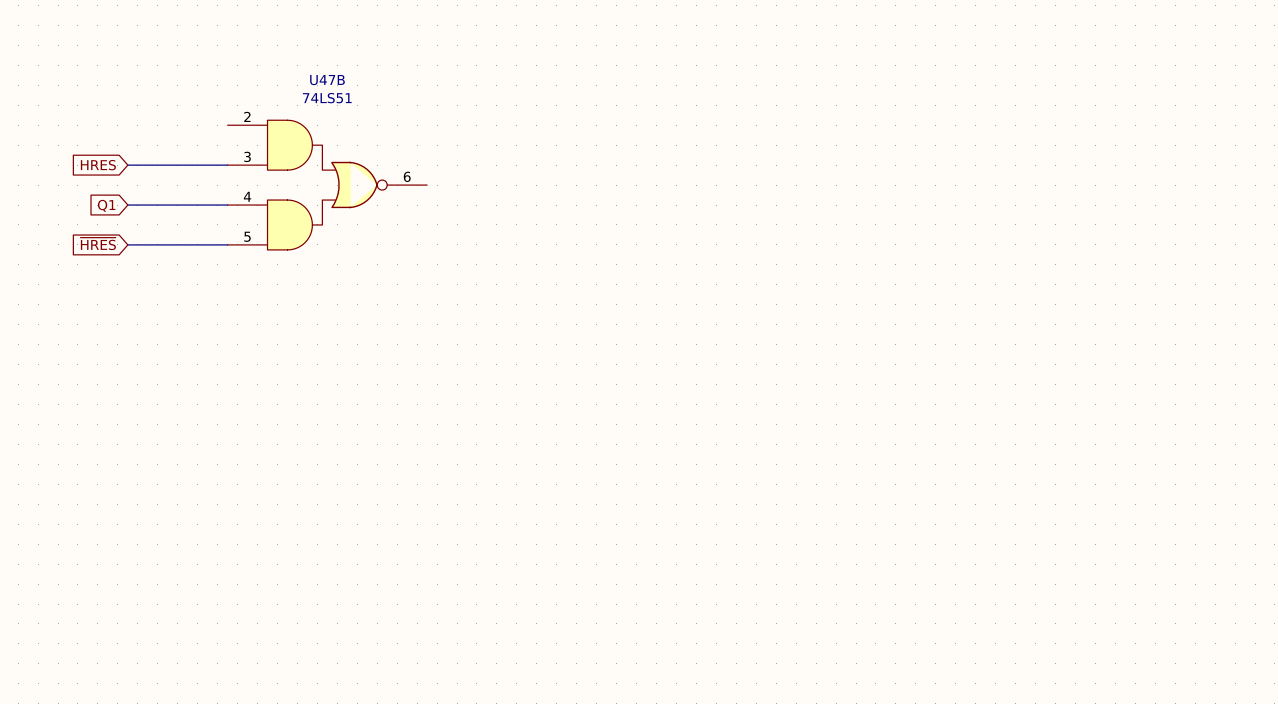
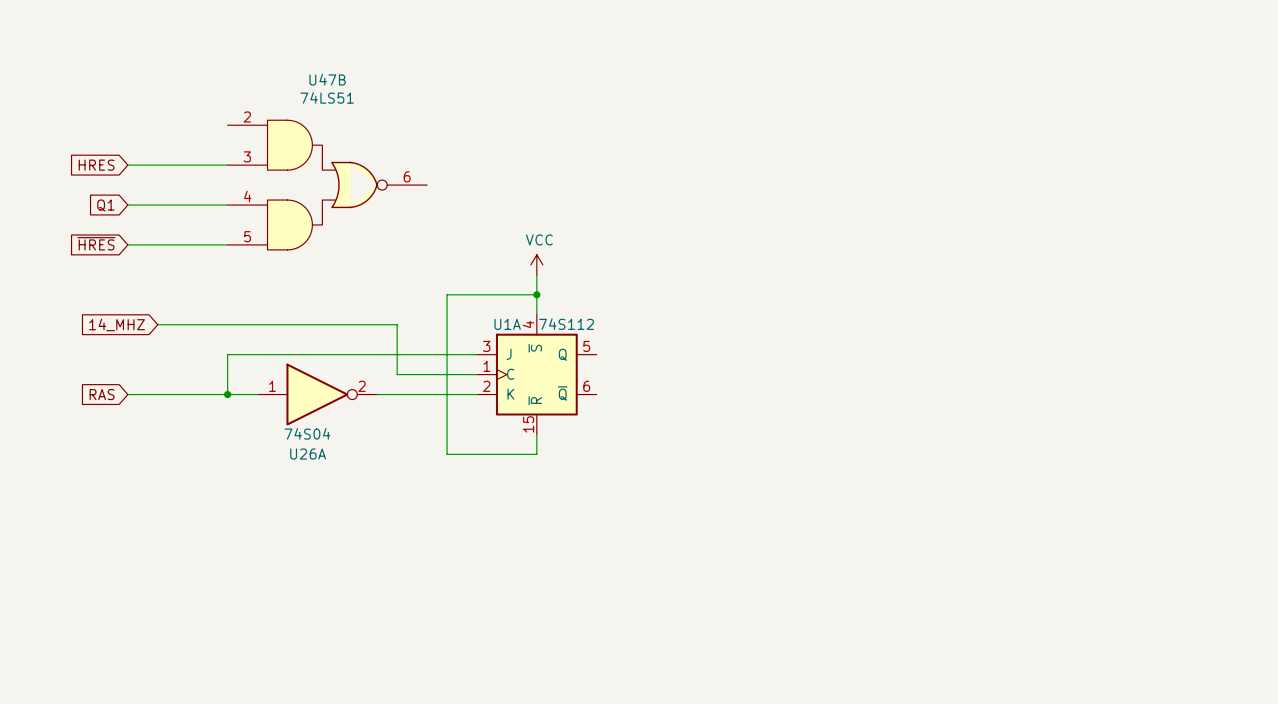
power symbol: none -> VCC (536, 264)
wire: none -> (536, 274) (536, 314)
wire: none -> (536, 294) (447, 294) (447, 454) (536, 454) (536, 434)
junction: none -> (536, 294)
wire: none -> (157, 324) (397, 324) (397, 374) (476, 374)
global label: none -> 14_MHZ (117, 324)
wire: none -> (476, 354) (227, 354) (227, 394)
U1A: none -> 74S112 (536, 374)
global label: none -> RAS (102, 394)
wire: none -> (127, 394) (257, 394)
junction: none -> (227, 394)
U26A: none -> 74S04 (317, 394)
wire: none -> (377, 394) (476, 394)

